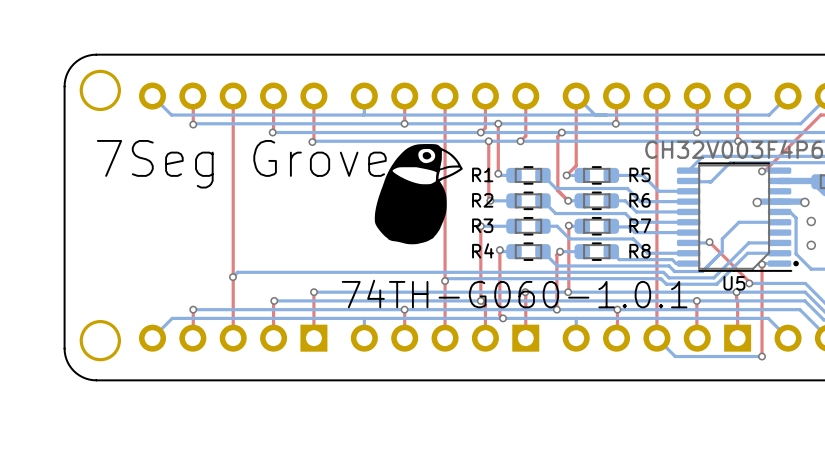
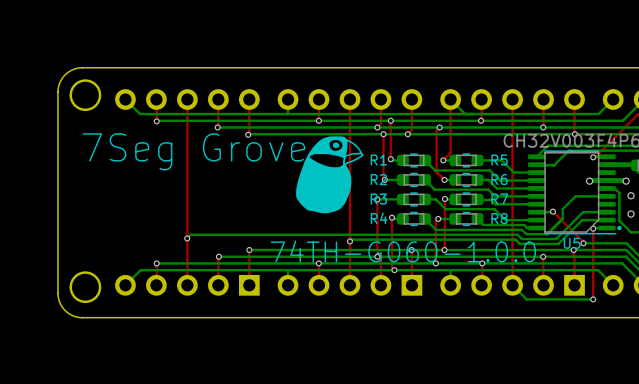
text: 74TH-G060-1.0.1 (514, 294) -> 74TH-G060-1.0.0 (403, 251)

